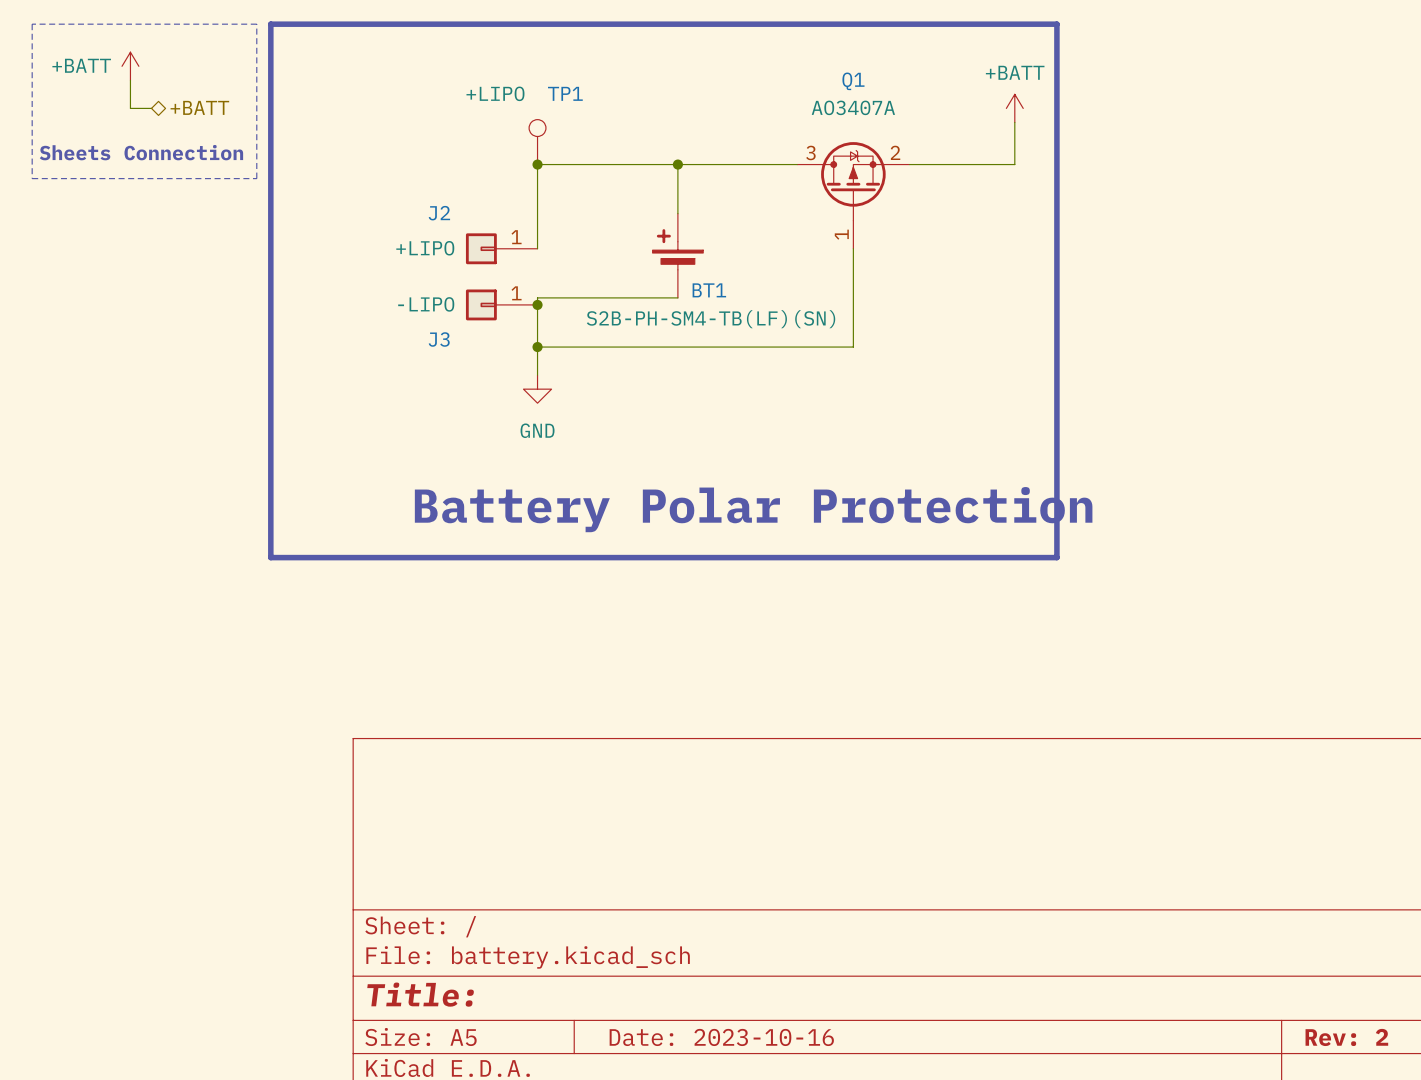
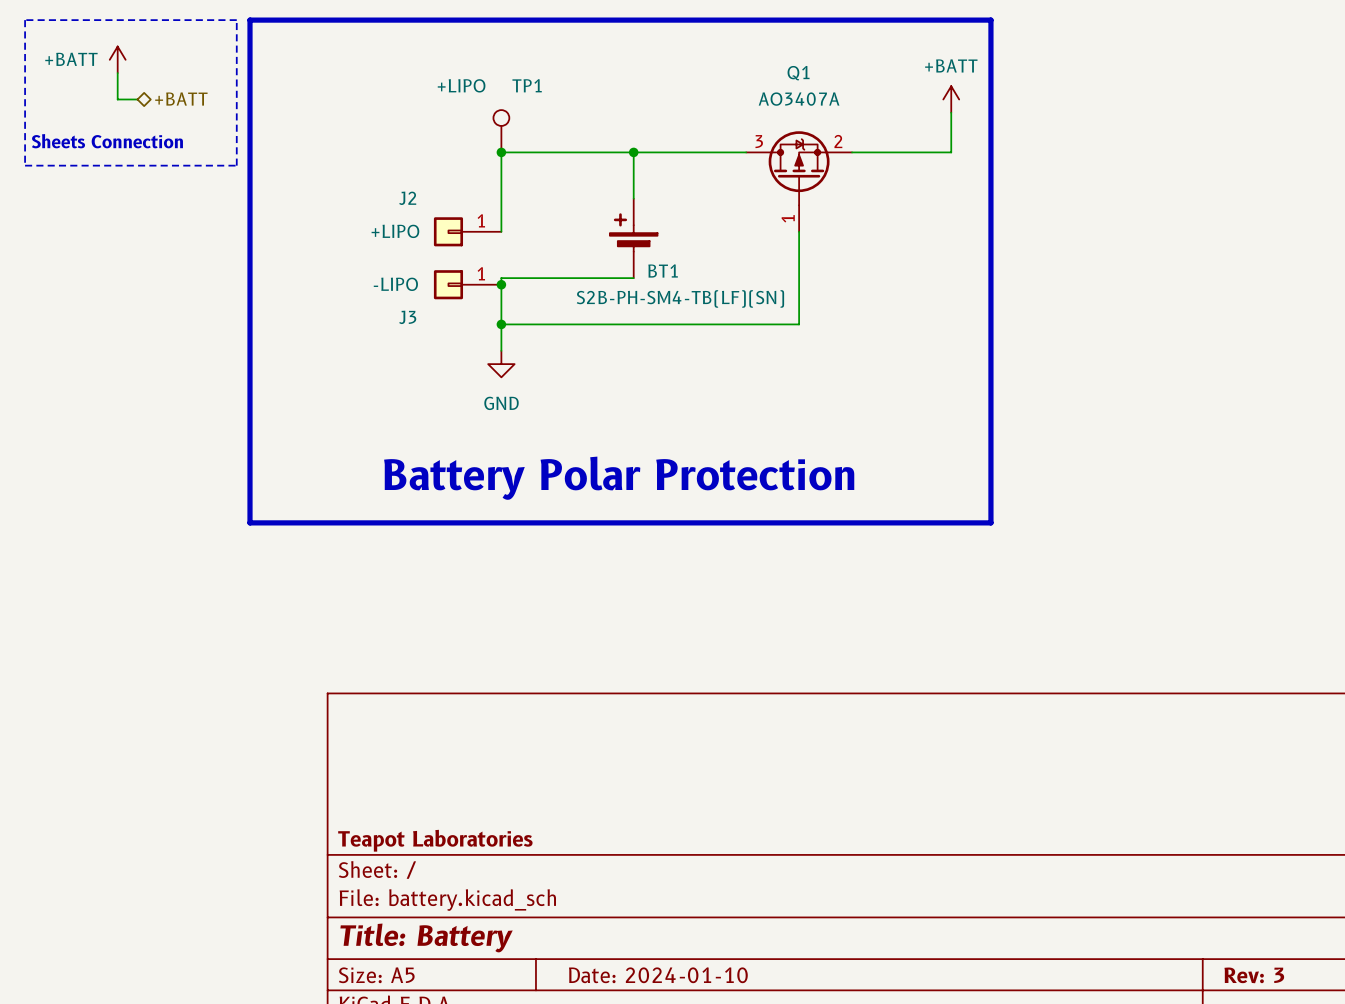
title block: none -> Teapot Laboratories (435, 840)
title block: Title: (420, 994) -> Title: Battery (426, 937)
title block: Date: 2023-10-16 (721, 1037) -> Date: 2024-01-10 (658, 975)
title block: Rev: 2 (1346, 1037) -> Rev: 3 (1254, 975)

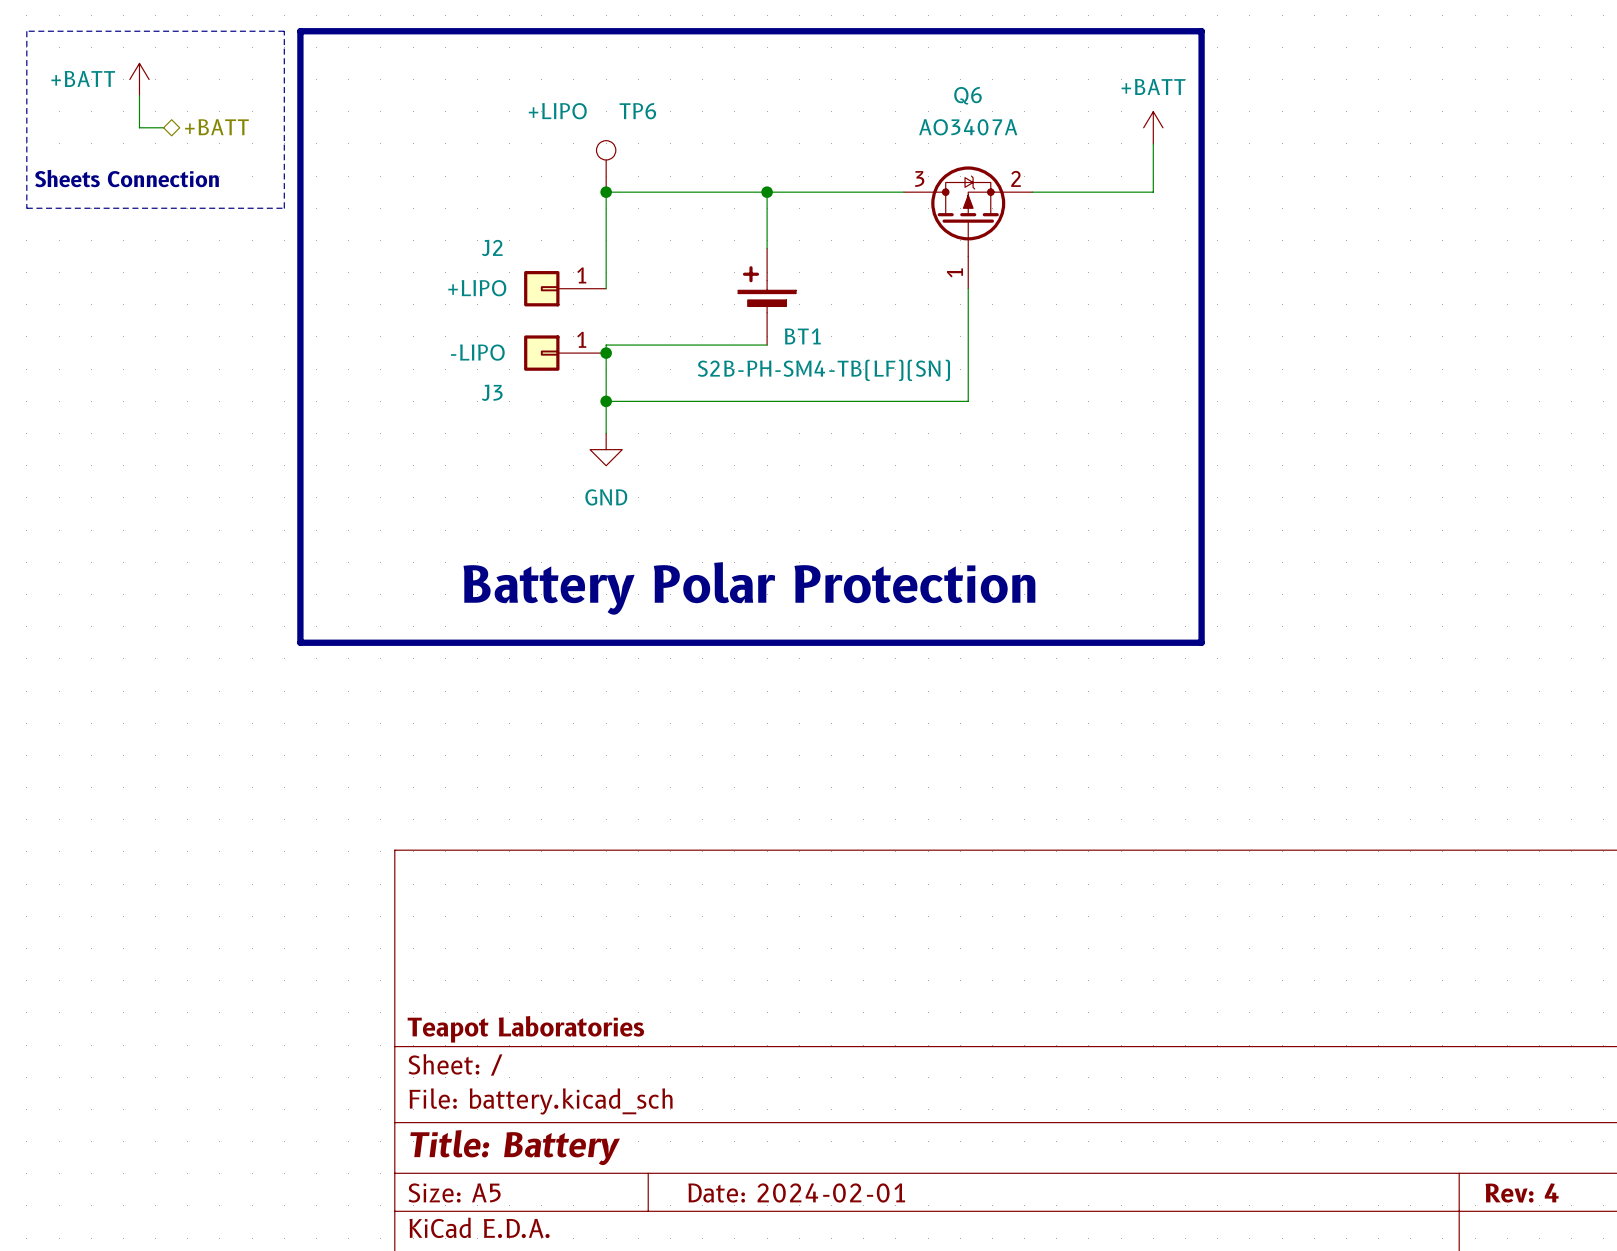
Q1 name: Q1 (798, 73) -> Q6 (967, 95)
TP1 name: TP1 (527, 85) -> TP6 (637, 111)
title block: Date: 2024-01-10 (658, 975) -> Date: 2024-02-01 (796, 1192)
title block: Rev: 3 (1254, 975) -> Rev: 4 (1522, 1193)

